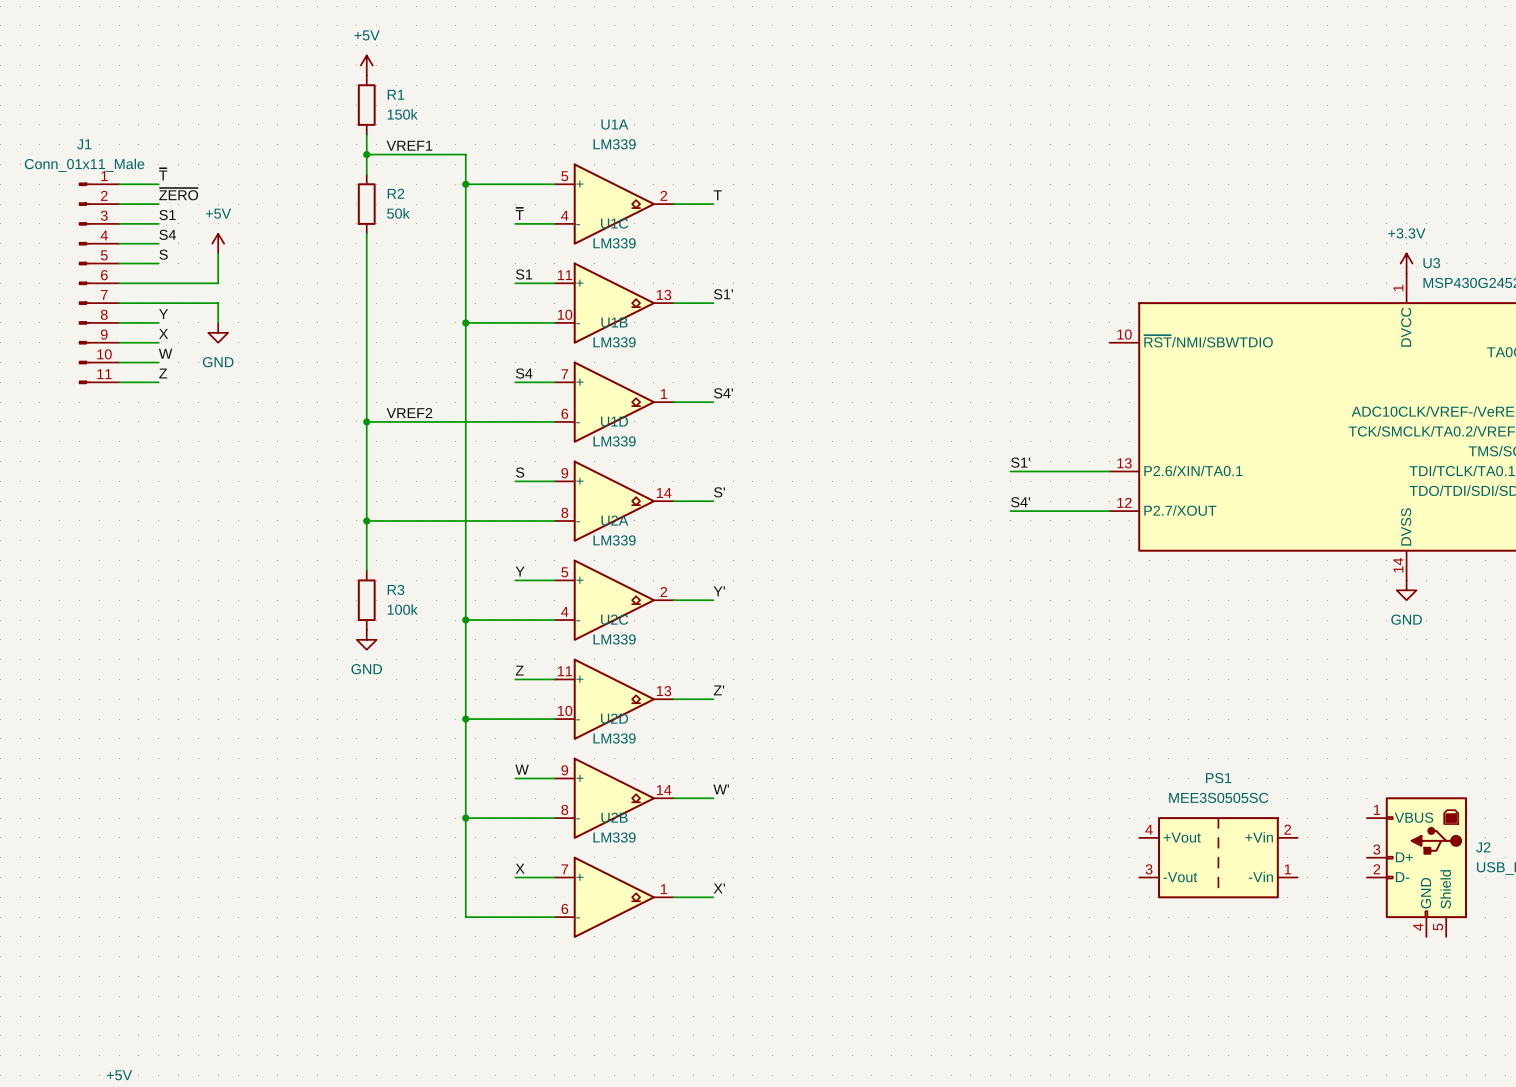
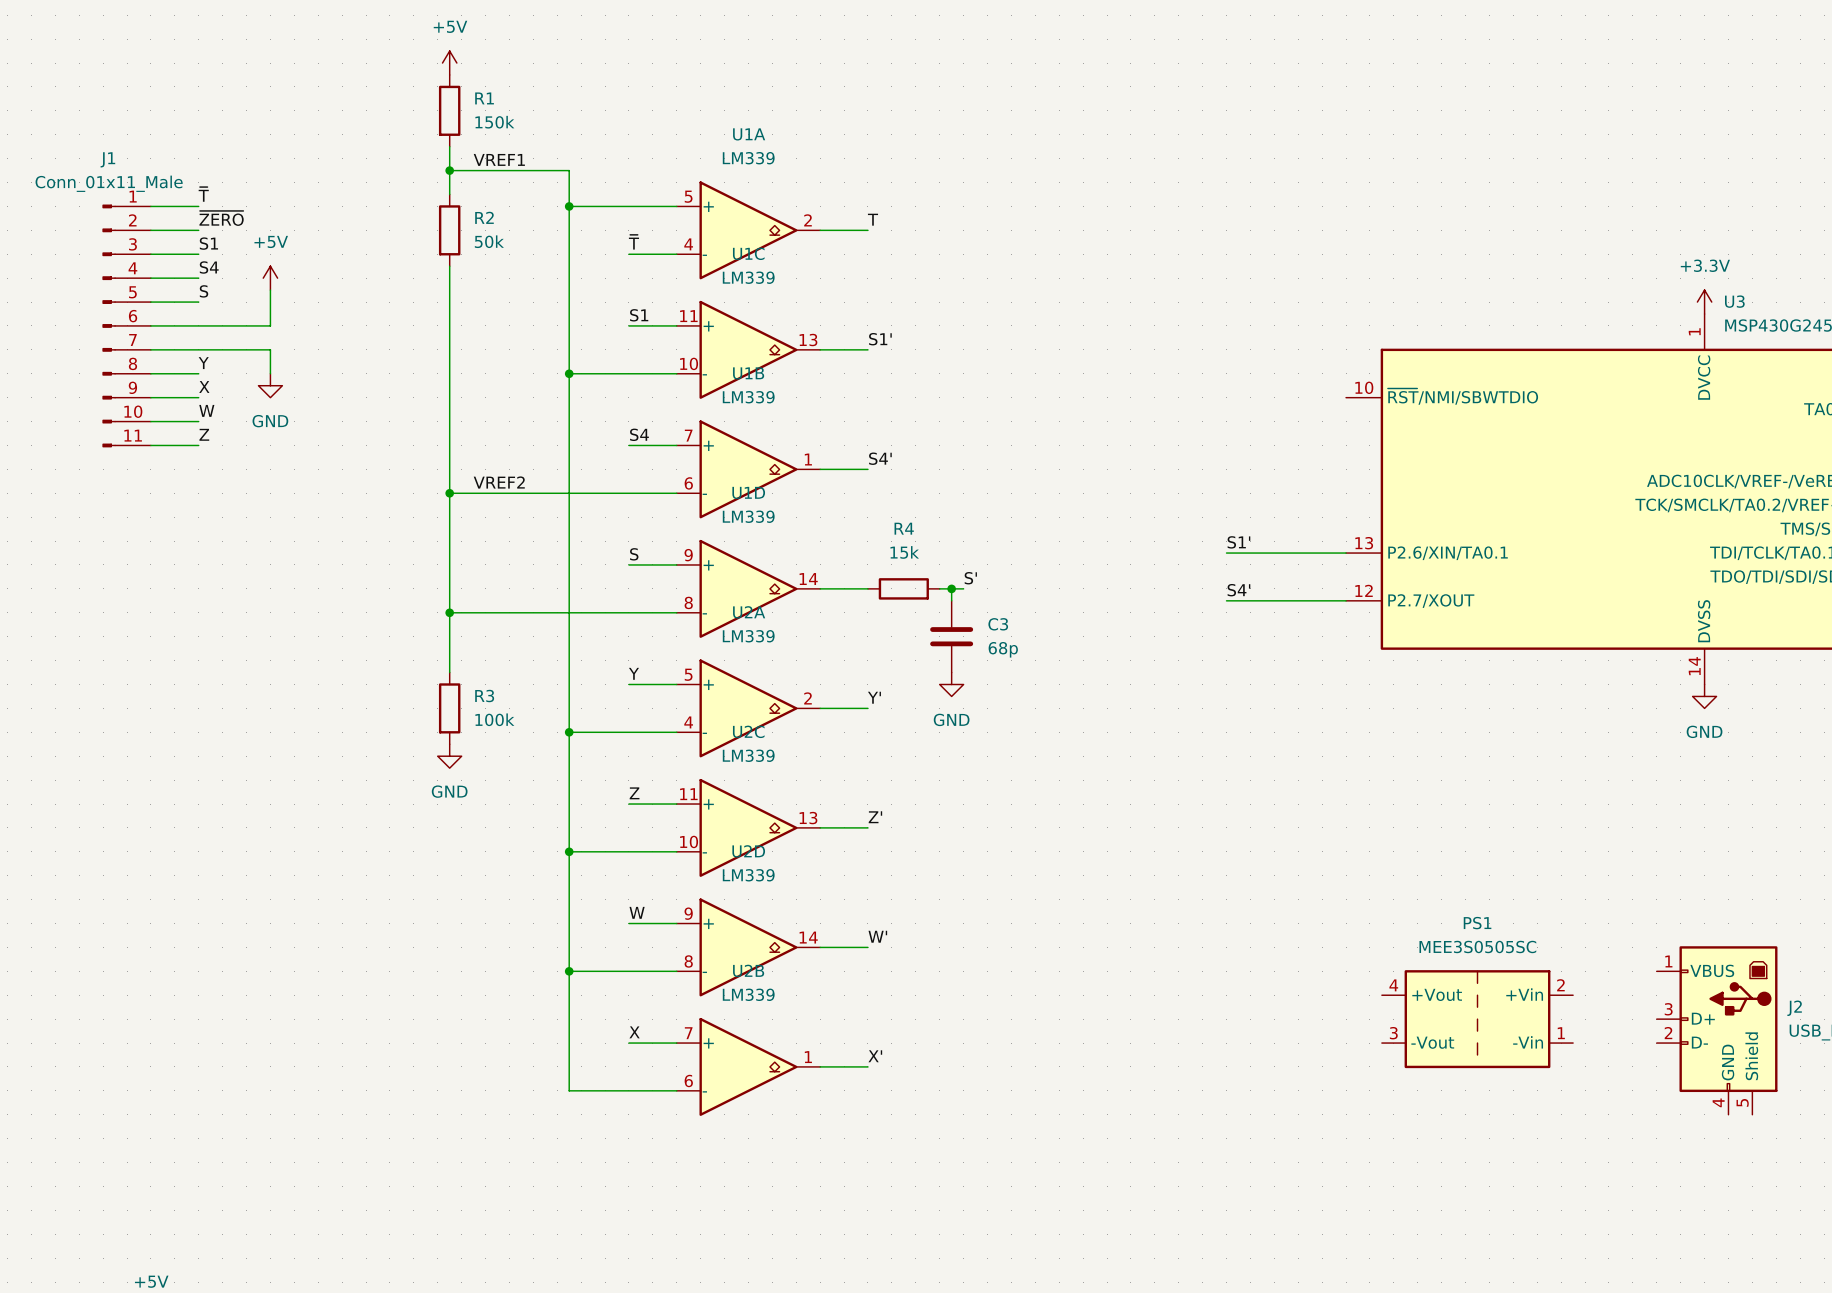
label position: S' (719, 492) -> S' (970, 578)
R4: none -> 15k (903, 588)
wire: none -> (939, 588) (963, 588)
wire: none -> (951, 588) (951, 600)
junction: none -> (951, 588)
C3: none -> 68p (951, 636)
power symbol: none -> GND (951, 684)

